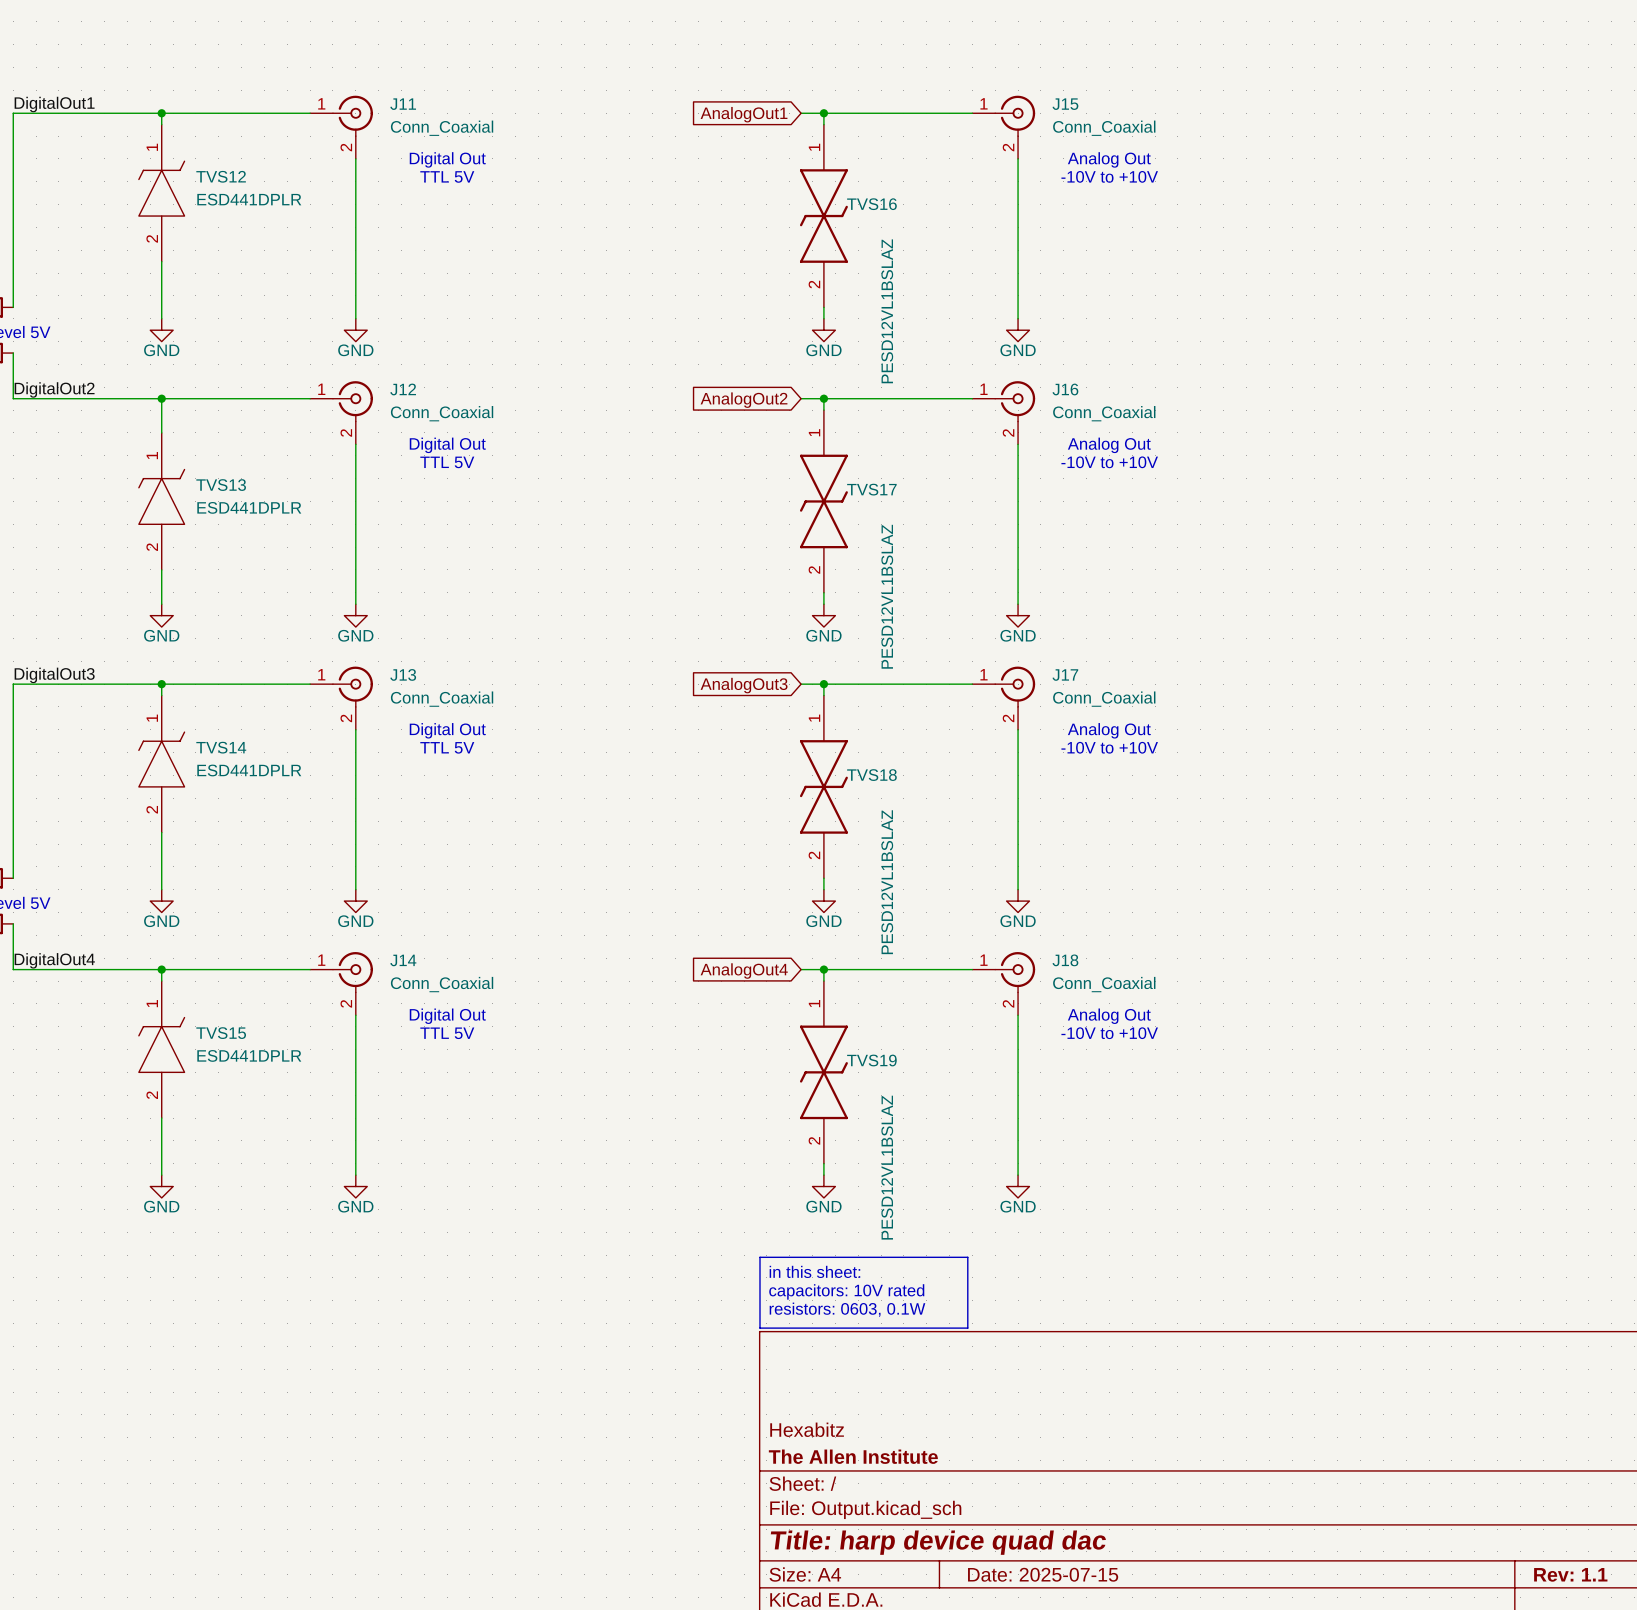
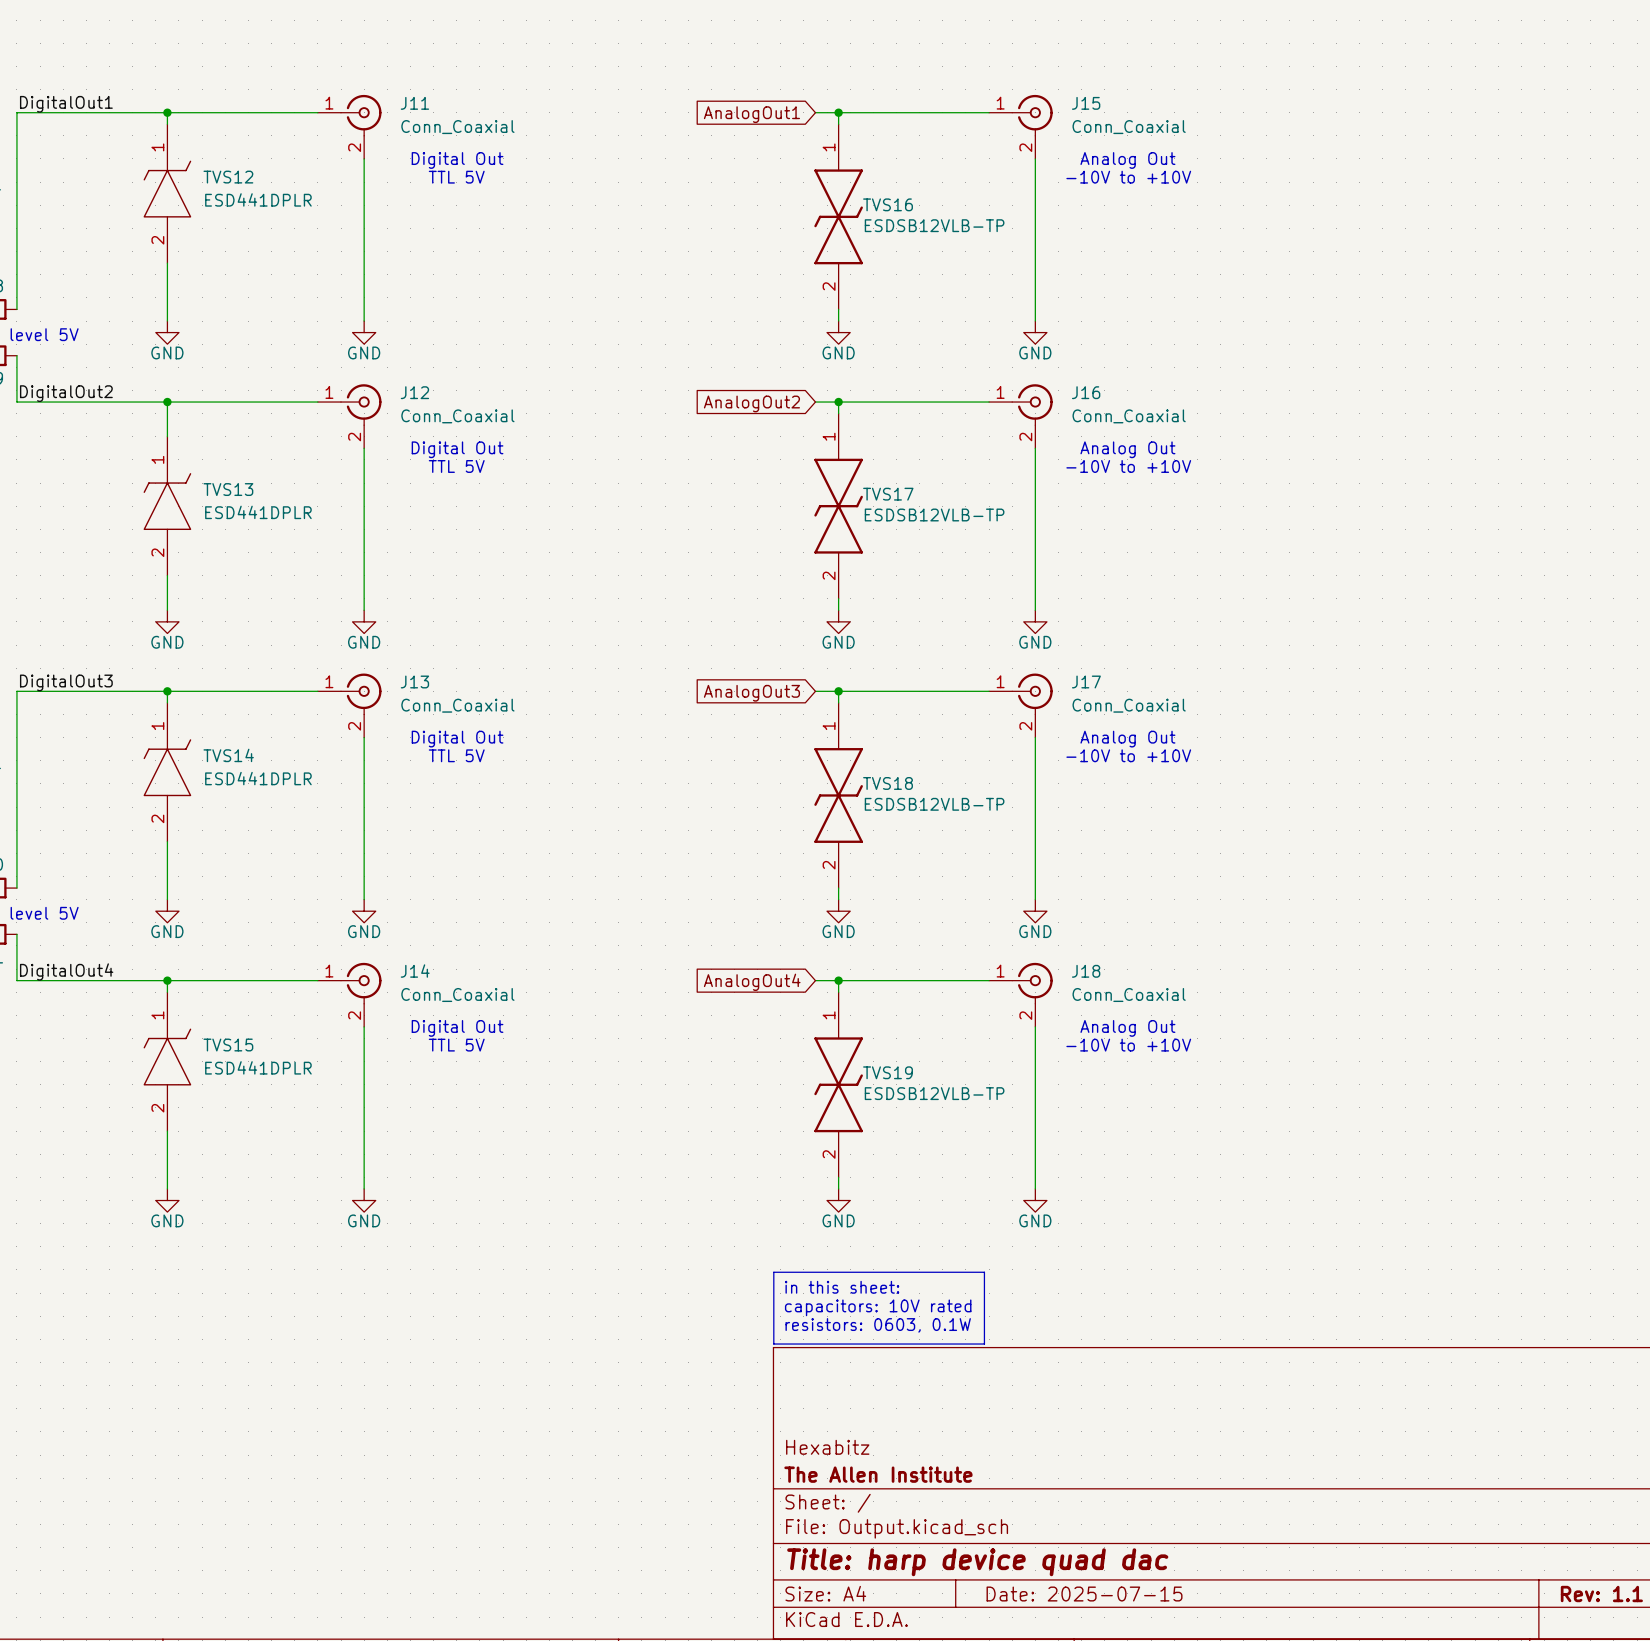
TVS16 value: PESD12VL1BSLAZ (887, 311) -> ESDSB12VLB-TP (934, 225)
TVS17 value: PESD12VL1BSLAZ (887, 596) -> ESDSB12VLB-TP (934, 514)
TVS18 value: PESD12VL1BSLAZ (887, 882) -> ESDSB12VLB-TP (934, 804)
TVS19 value: PESD12VL1BSLAZ (887, 1167) -> ESDSB12VLB-TP (934, 1093)

